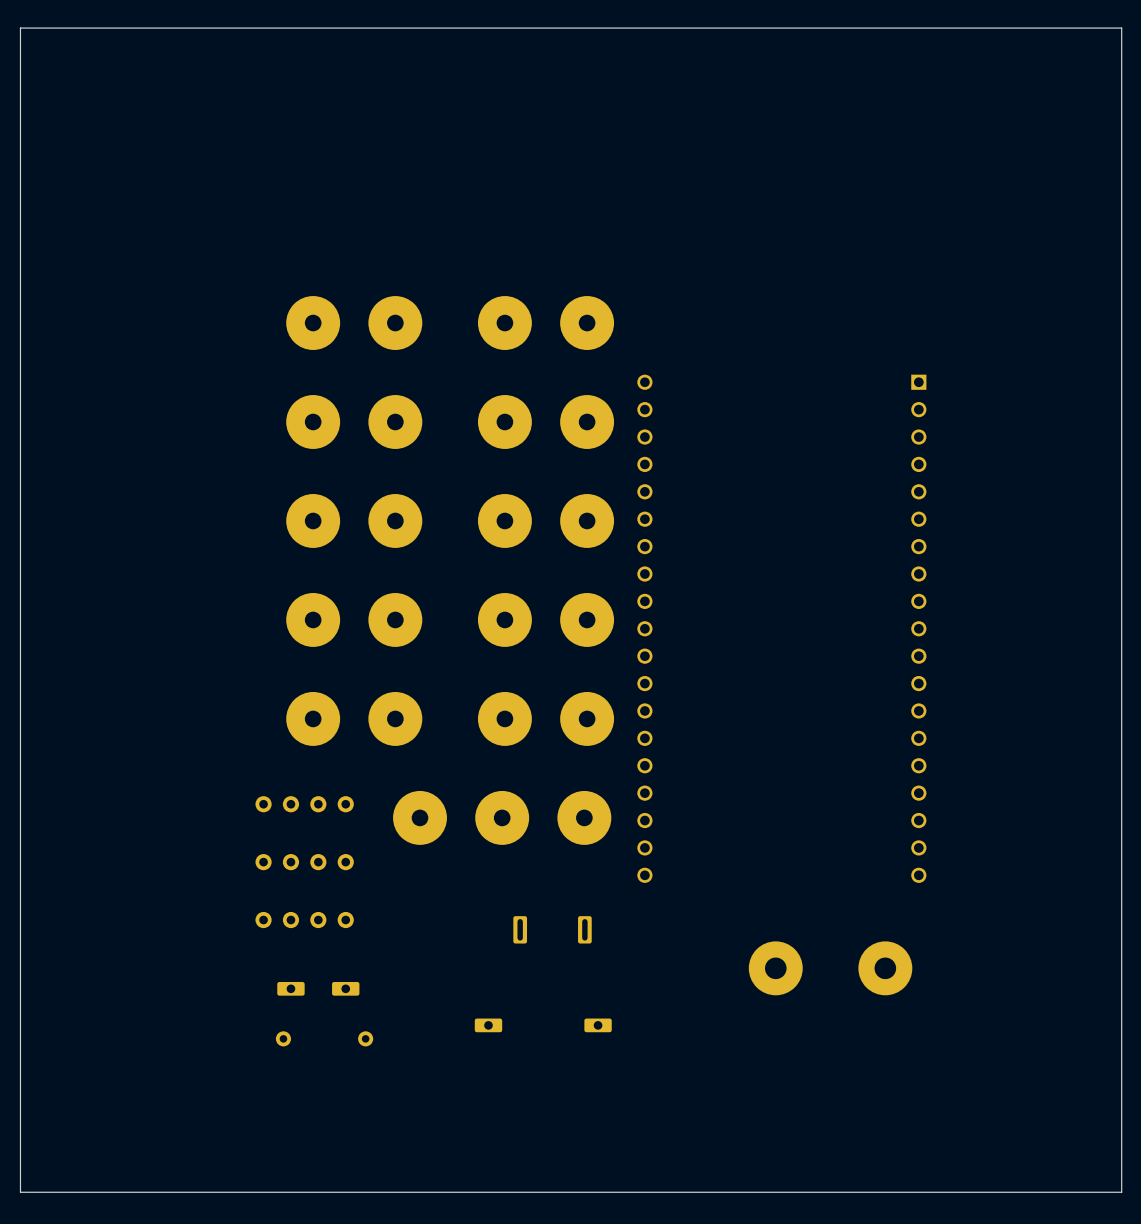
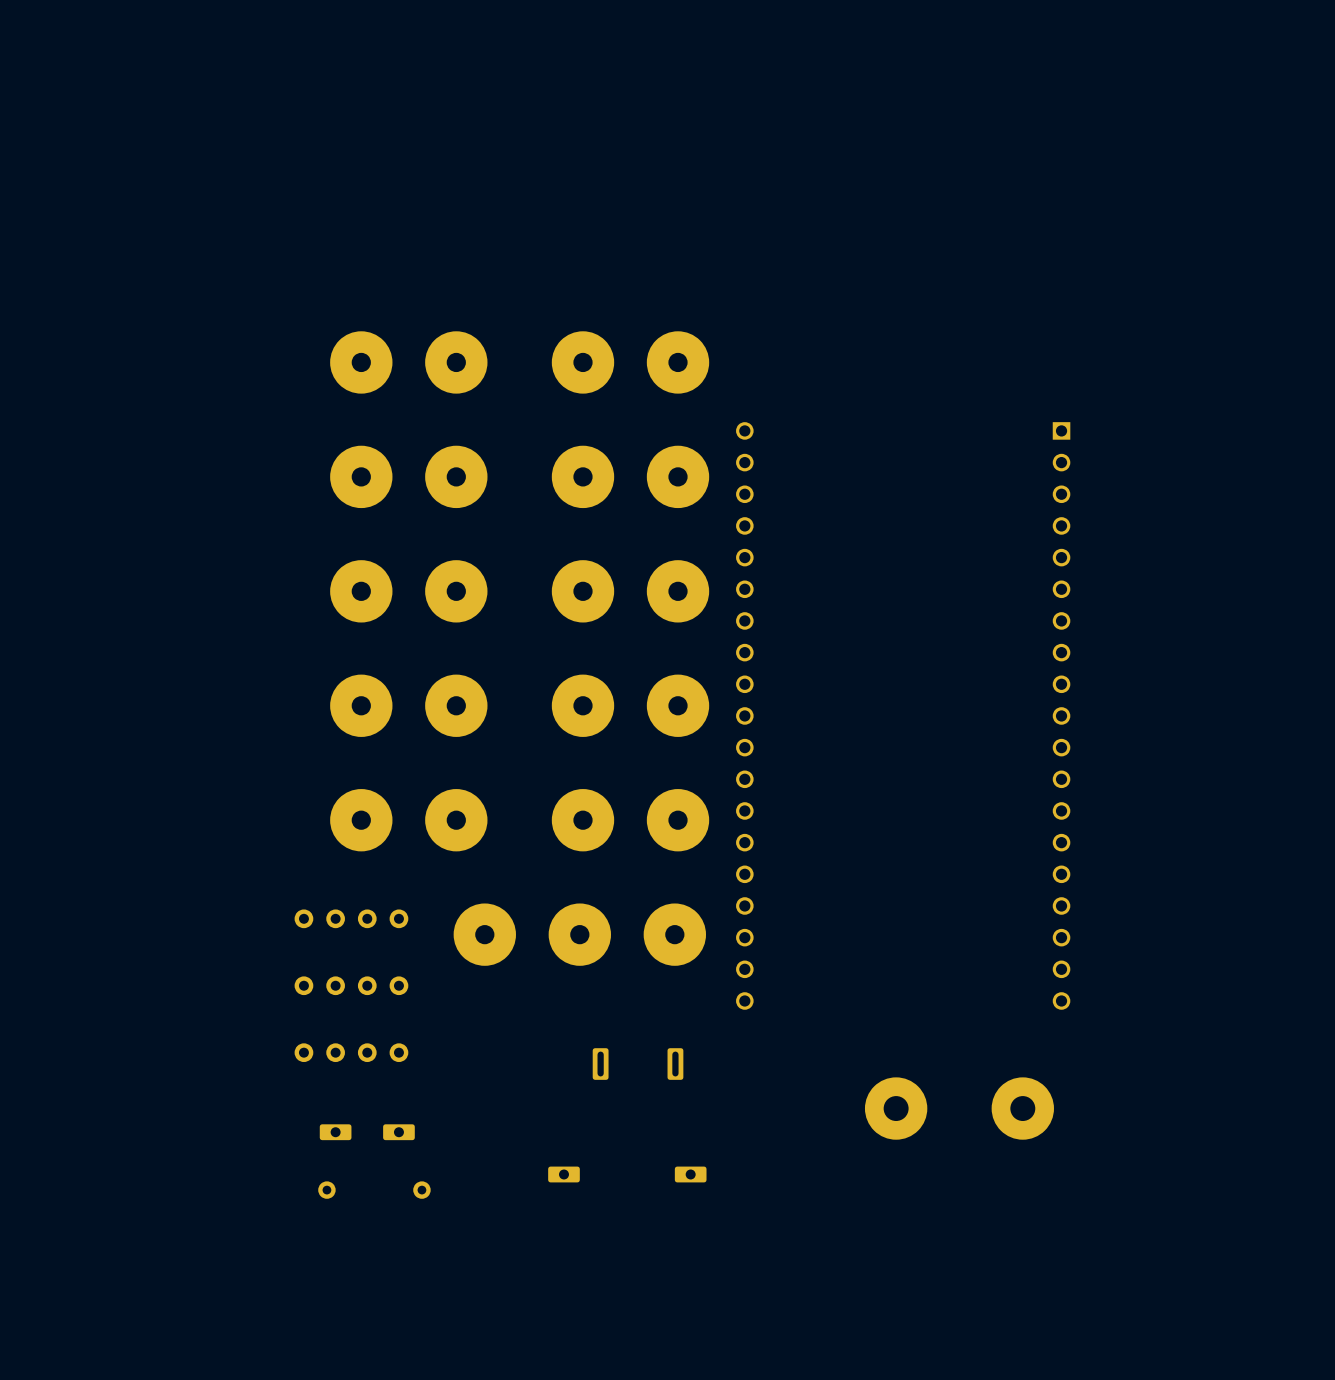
board edge: (1121, 28) (20, 28) (20, 1192) (1121, 1192) (1121, 28) -> none

